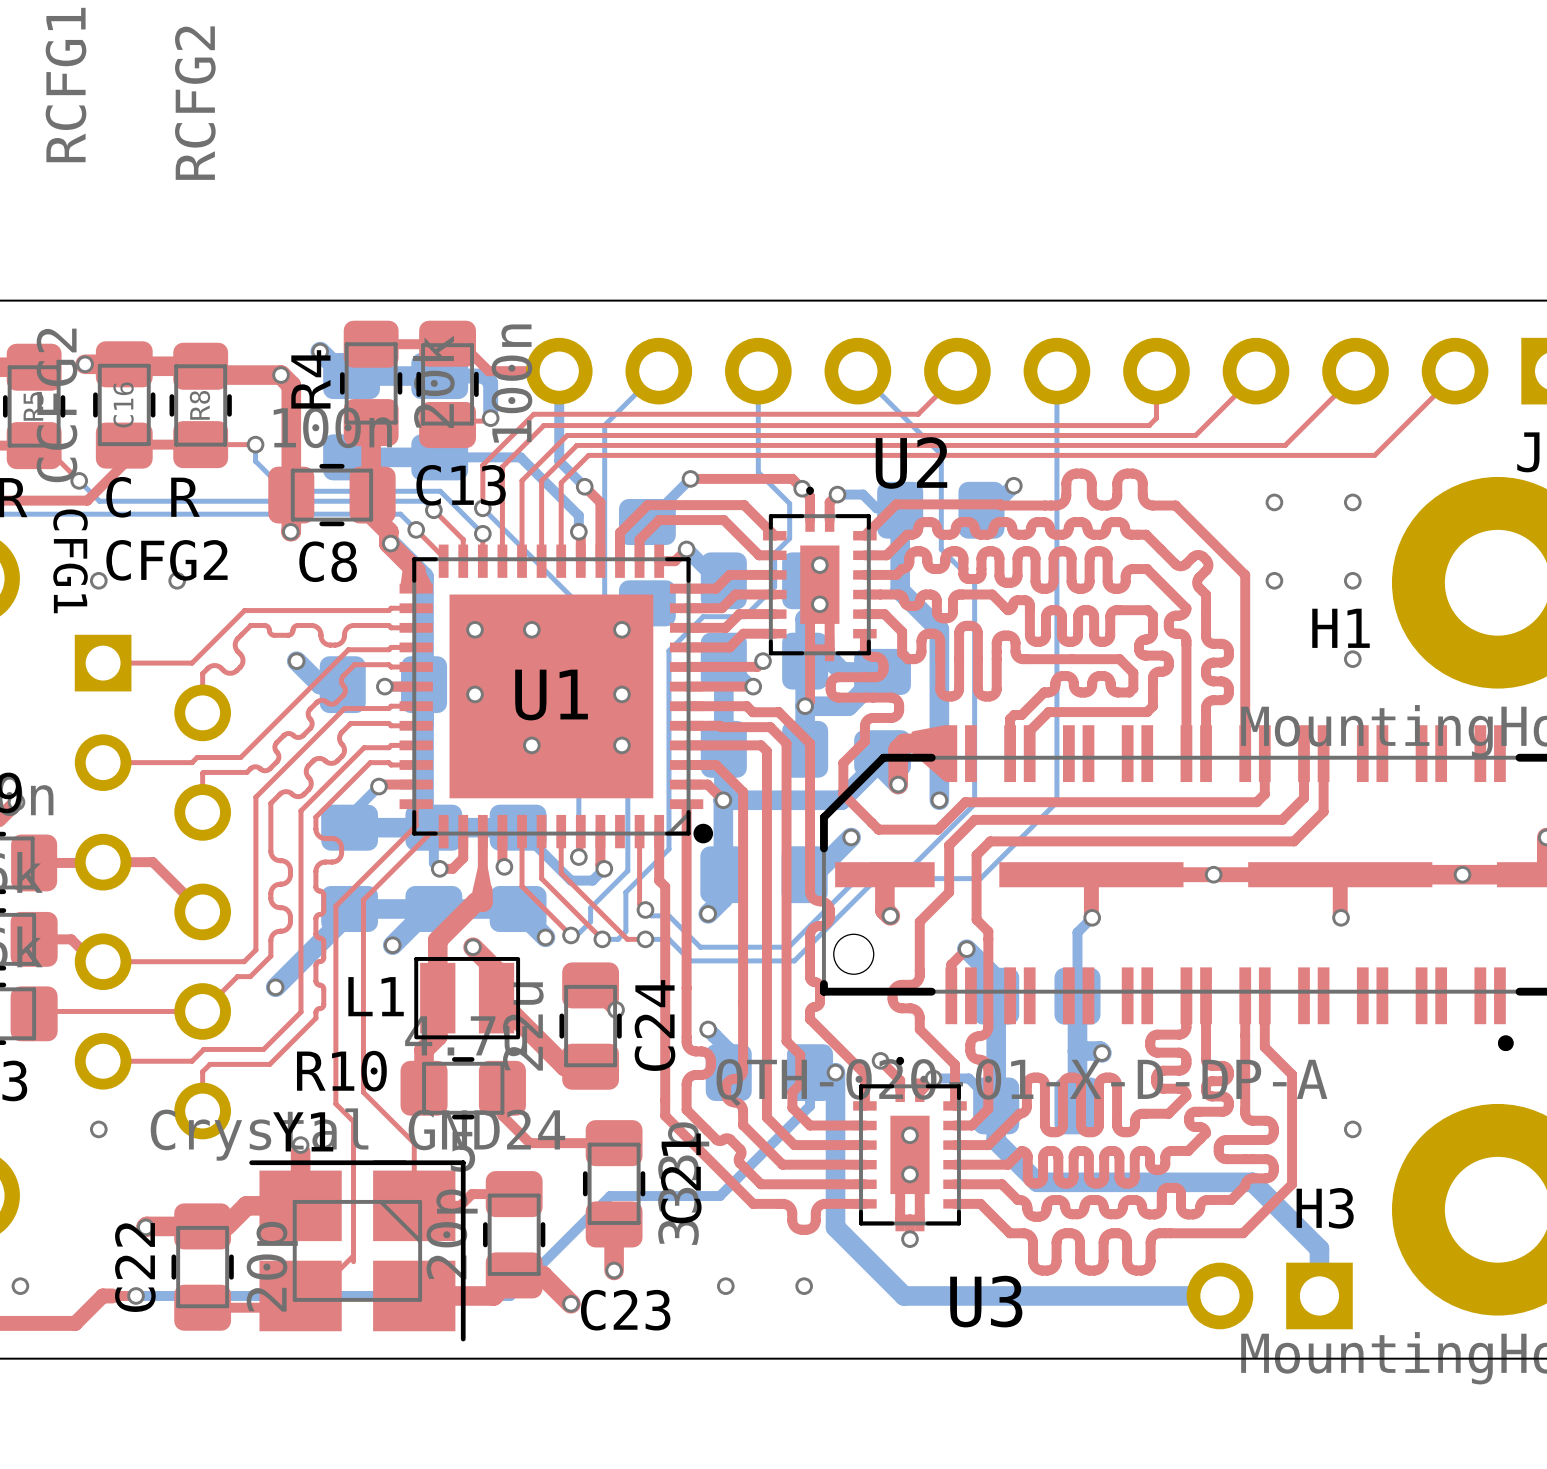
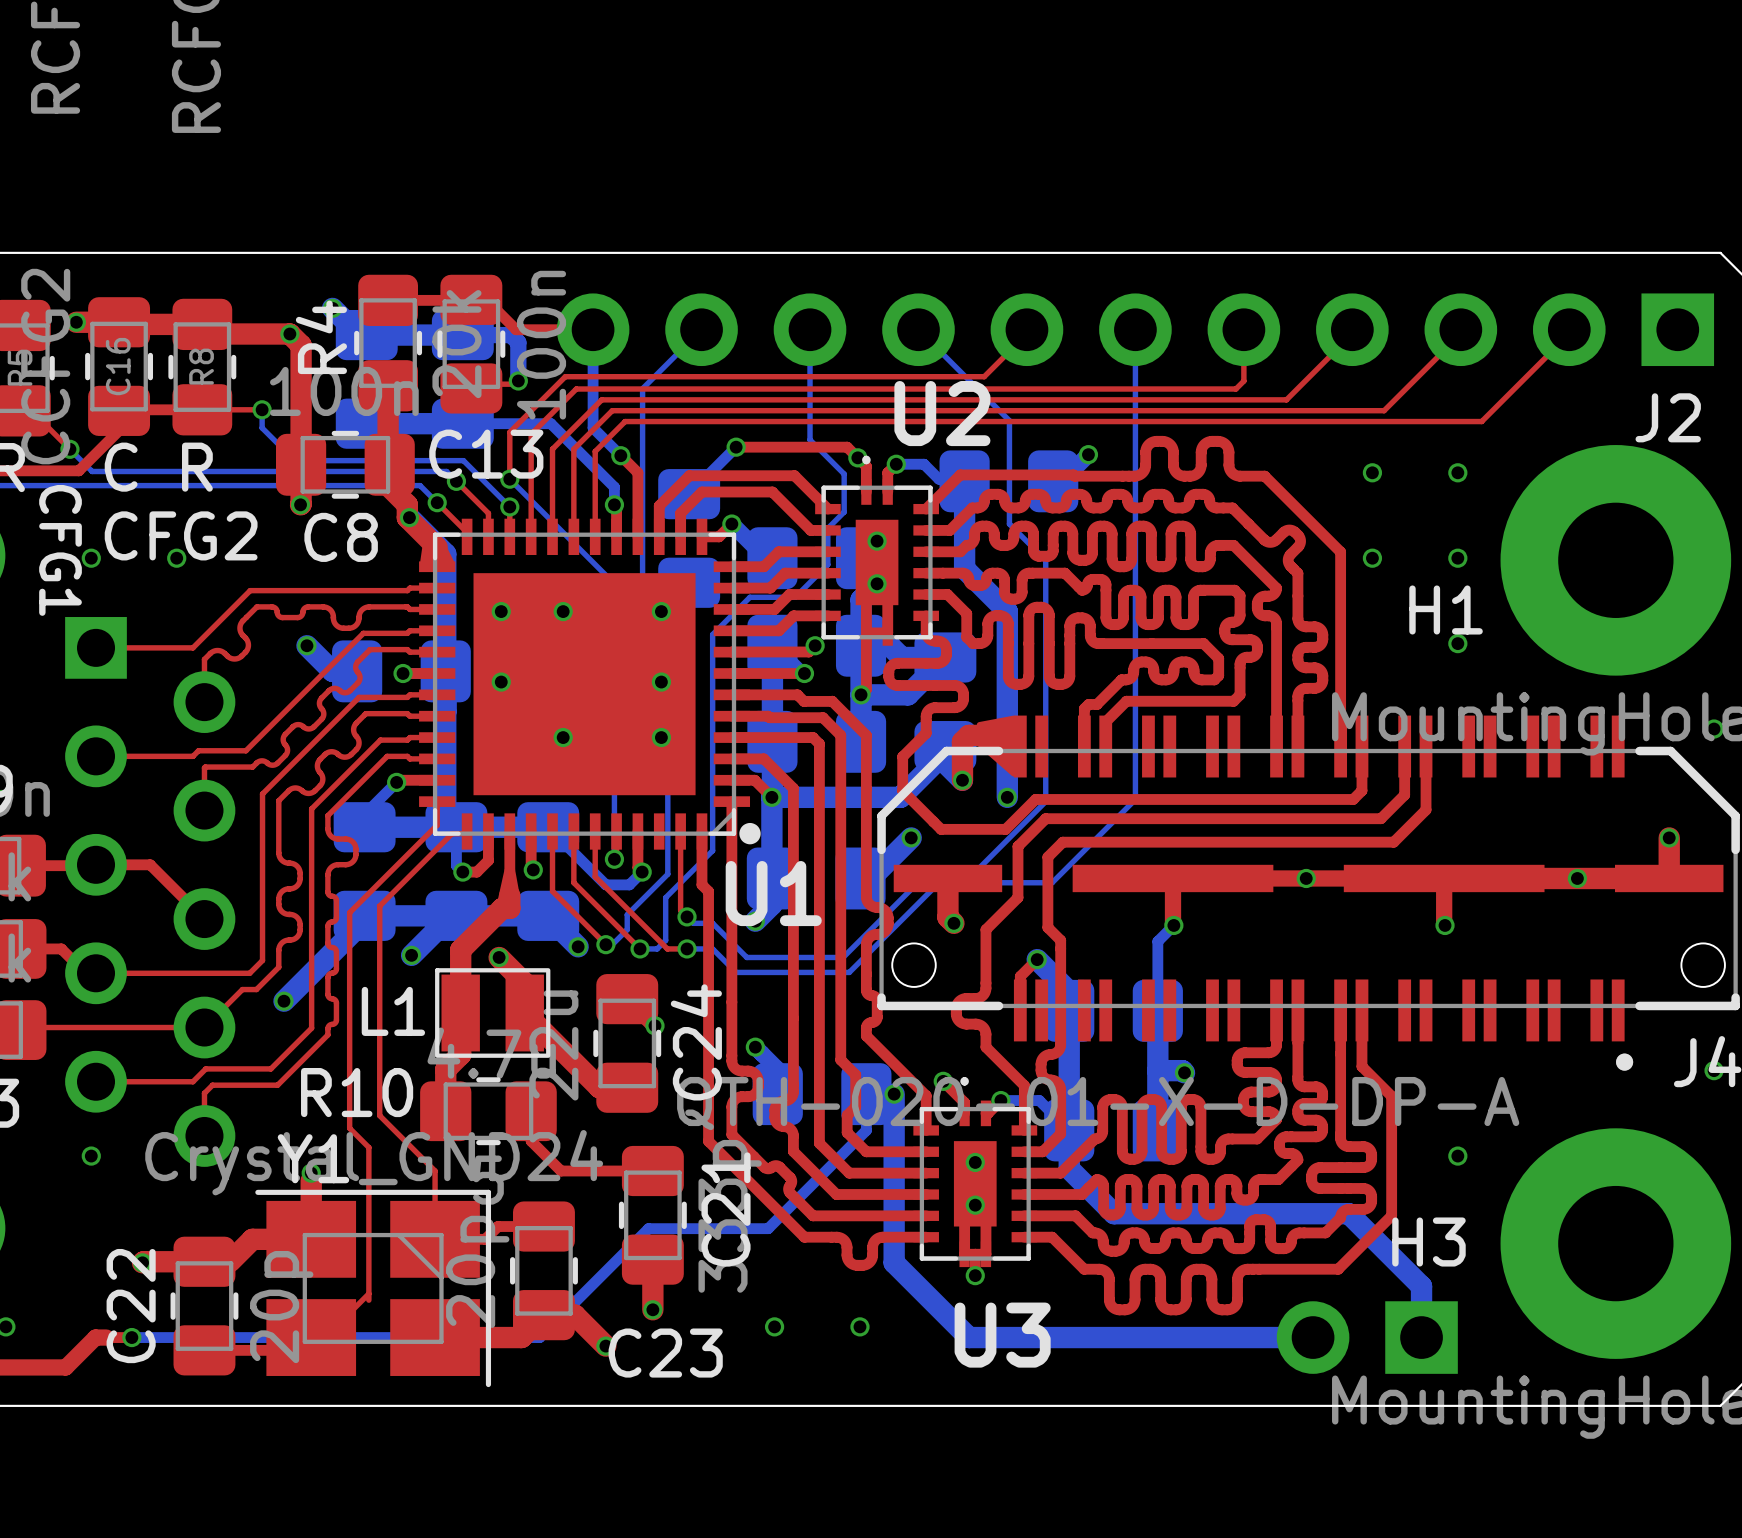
U2 name position: U2 (911, 462) -> U2 (942, 413)
U1 name position: U1 (551, 695) -> U1 (773, 893)
U3 name position: U3 (986, 1301) -> U3 (1002, 1335)

